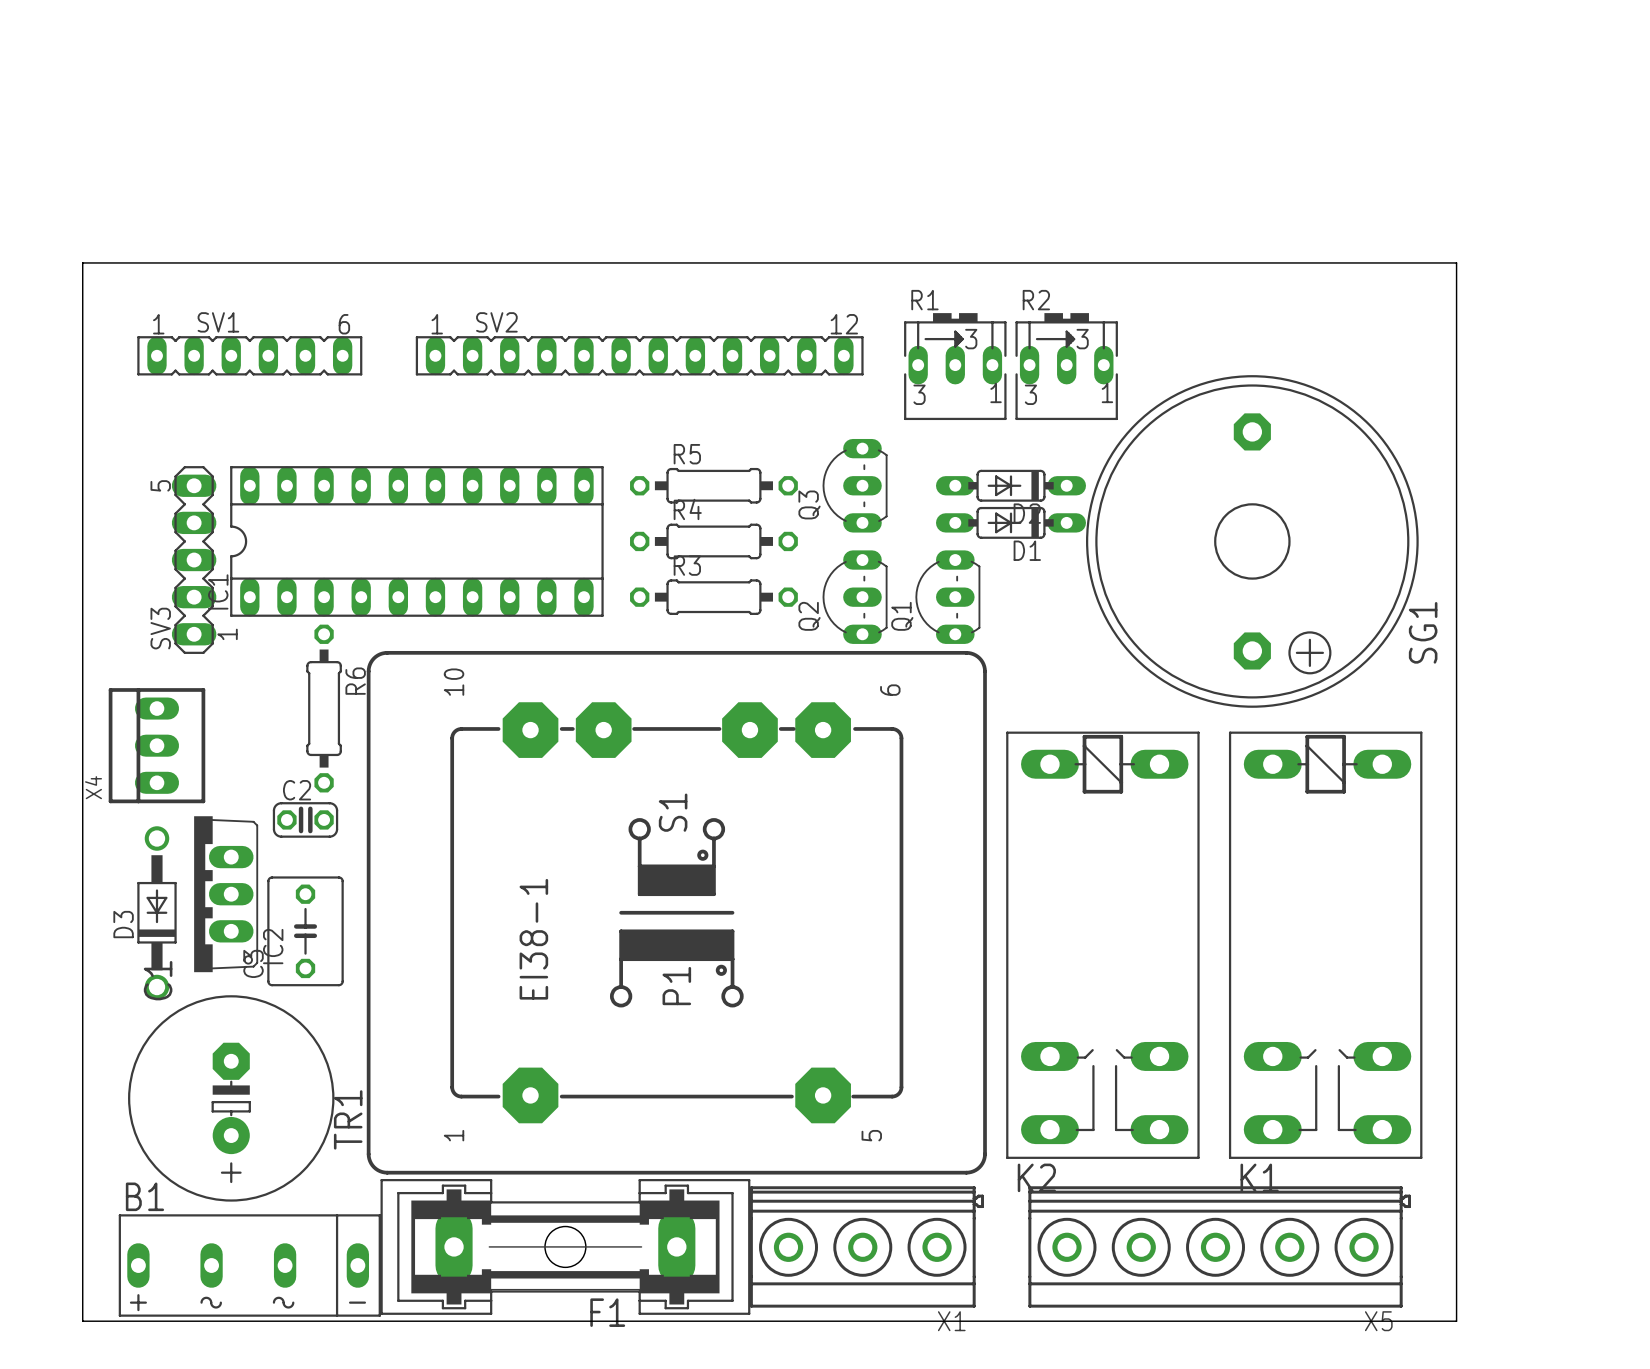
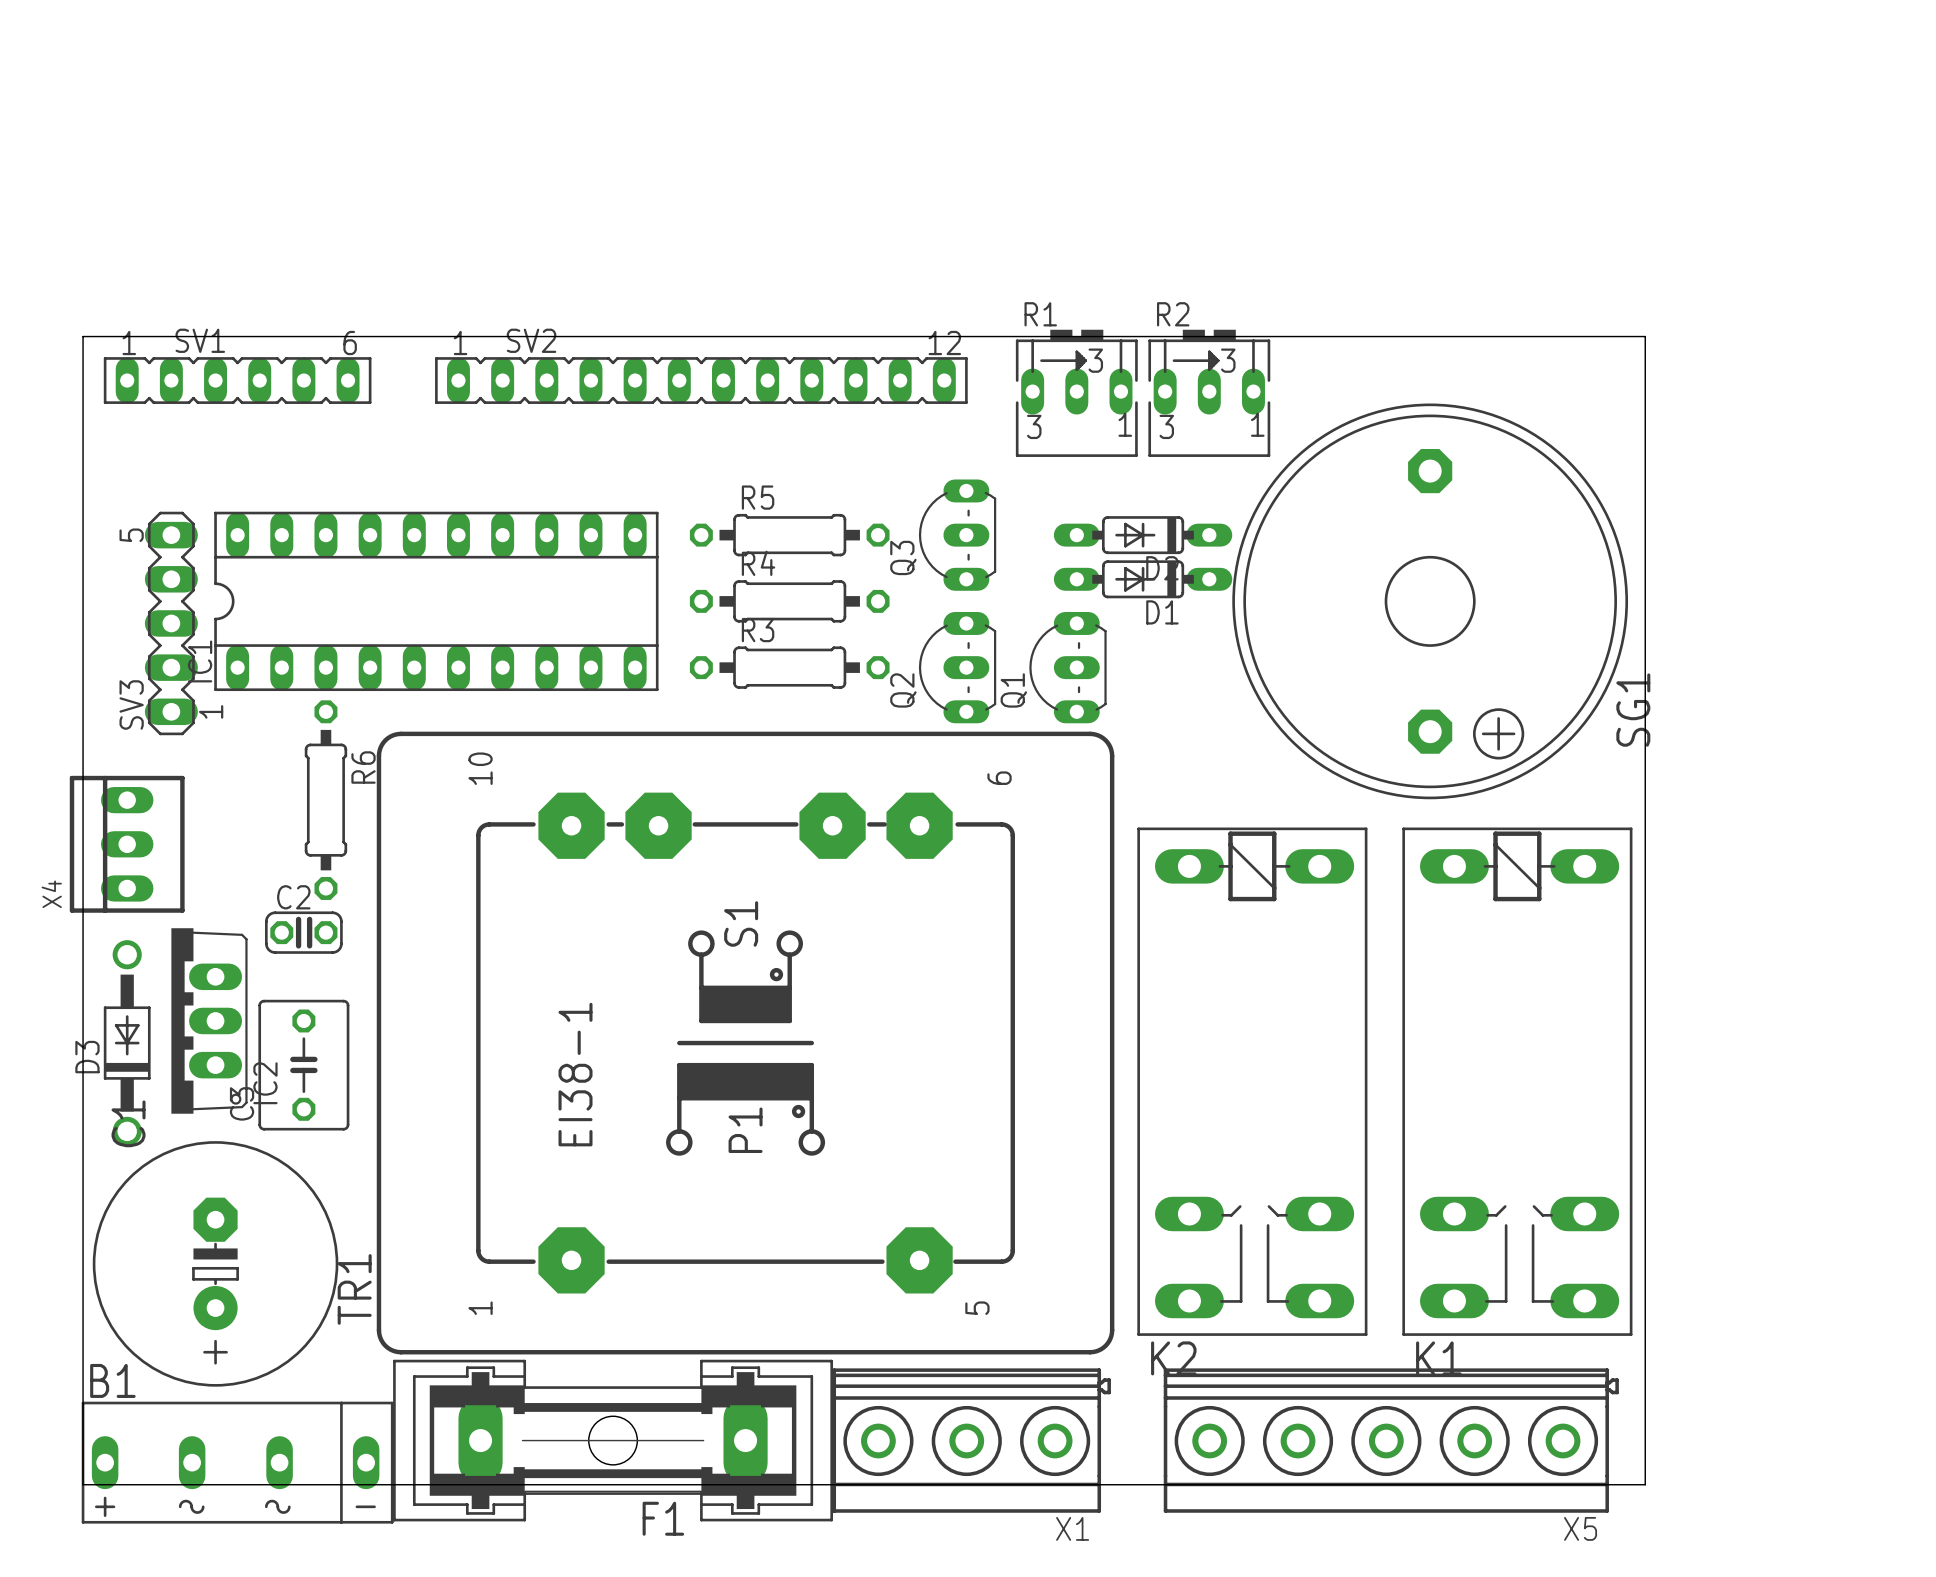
board edge: (82, 262) (1456, 262) (1456, 1321) (82, 1321) (82, 262) -> (83, 336) (83, 1484) (1645, 1484) (1645, 336) (83, 336)

